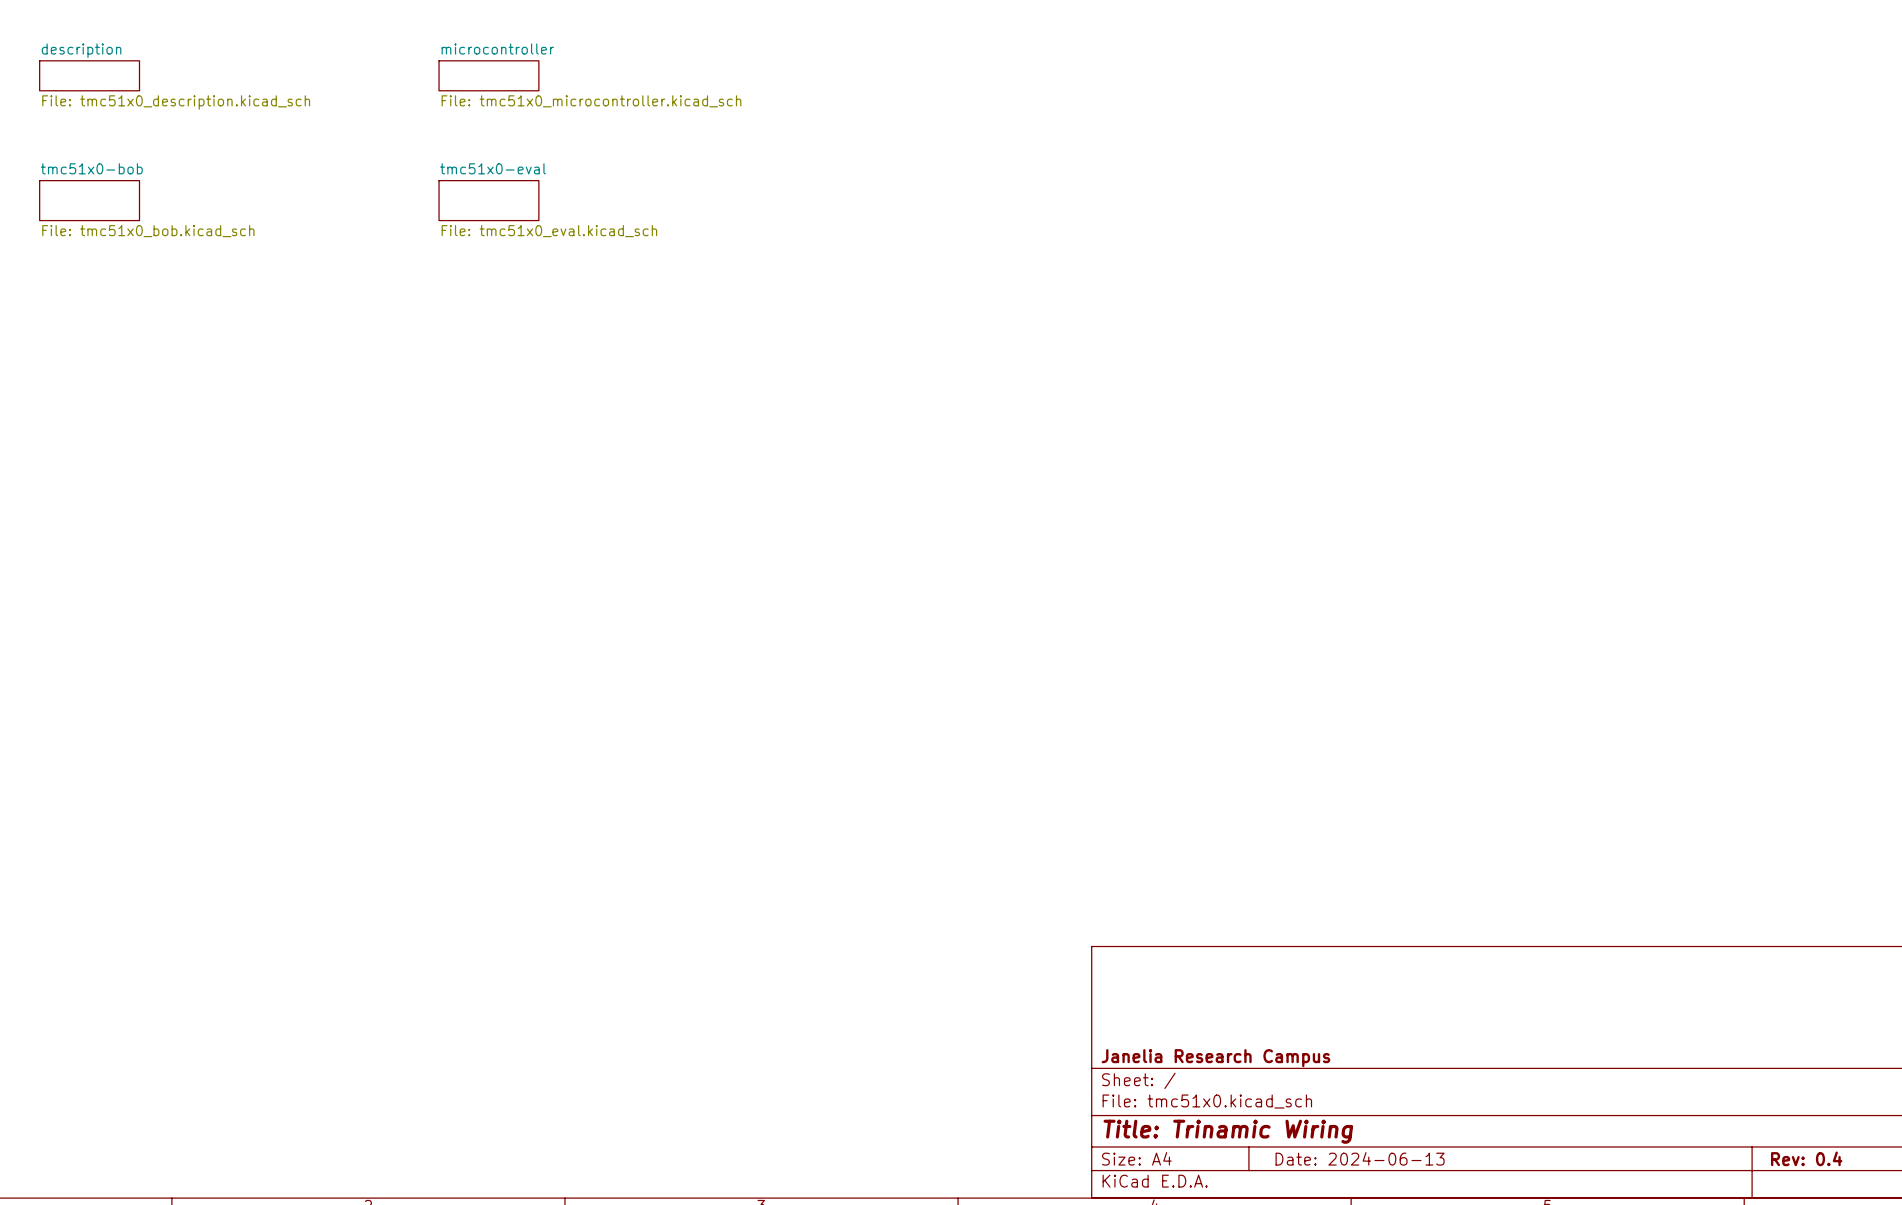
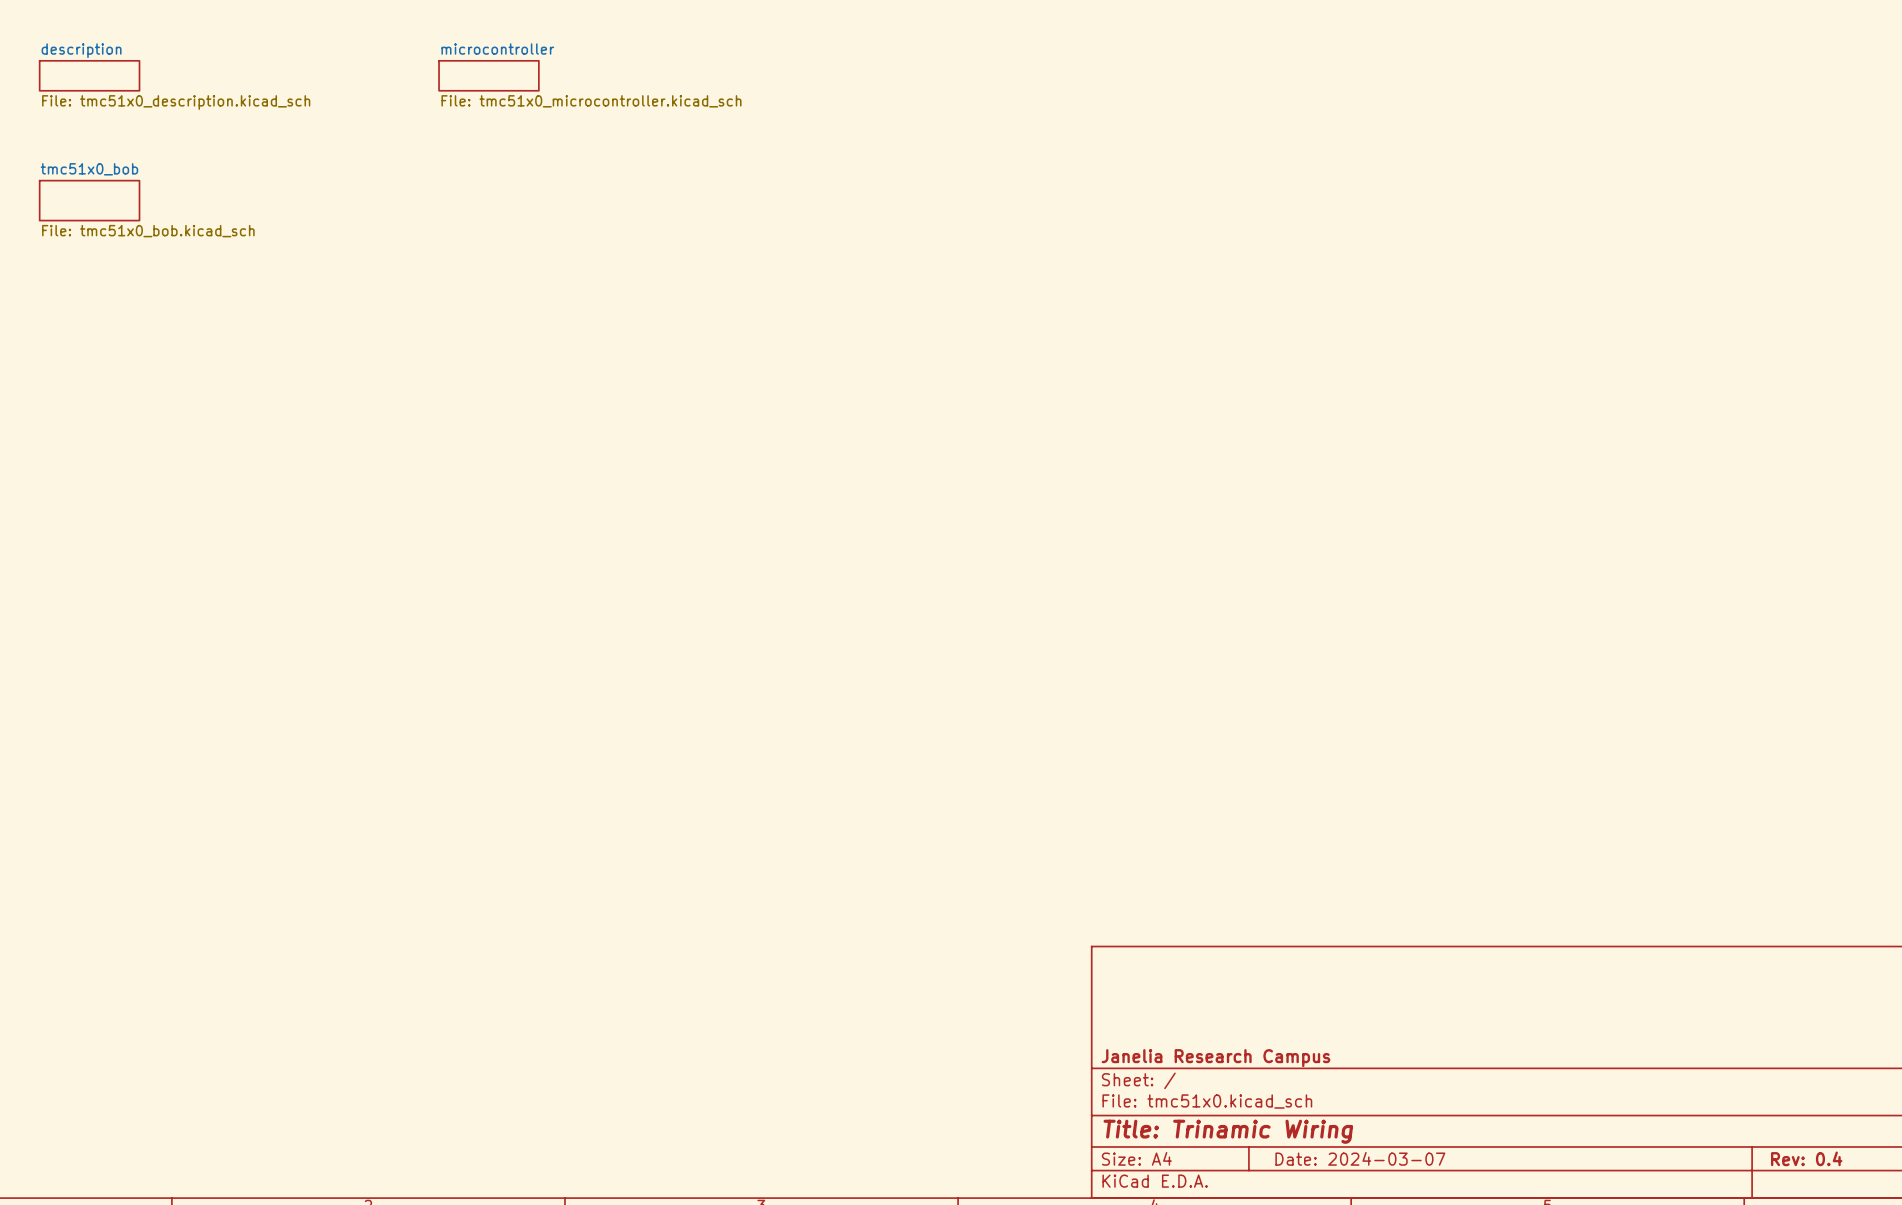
sheet tmc51x0-bob name: tmc51x0-bob (91, 168) -> tmc51x0_bob (89, 169)
sheet tmc51x0-eval: File: tmc51x0_eval.kicad_sch (488, 200) -> none
title block: Date: 2024-06-13 (1360, 1158) -> Date: 2024-03-07 (1360, 1158)

